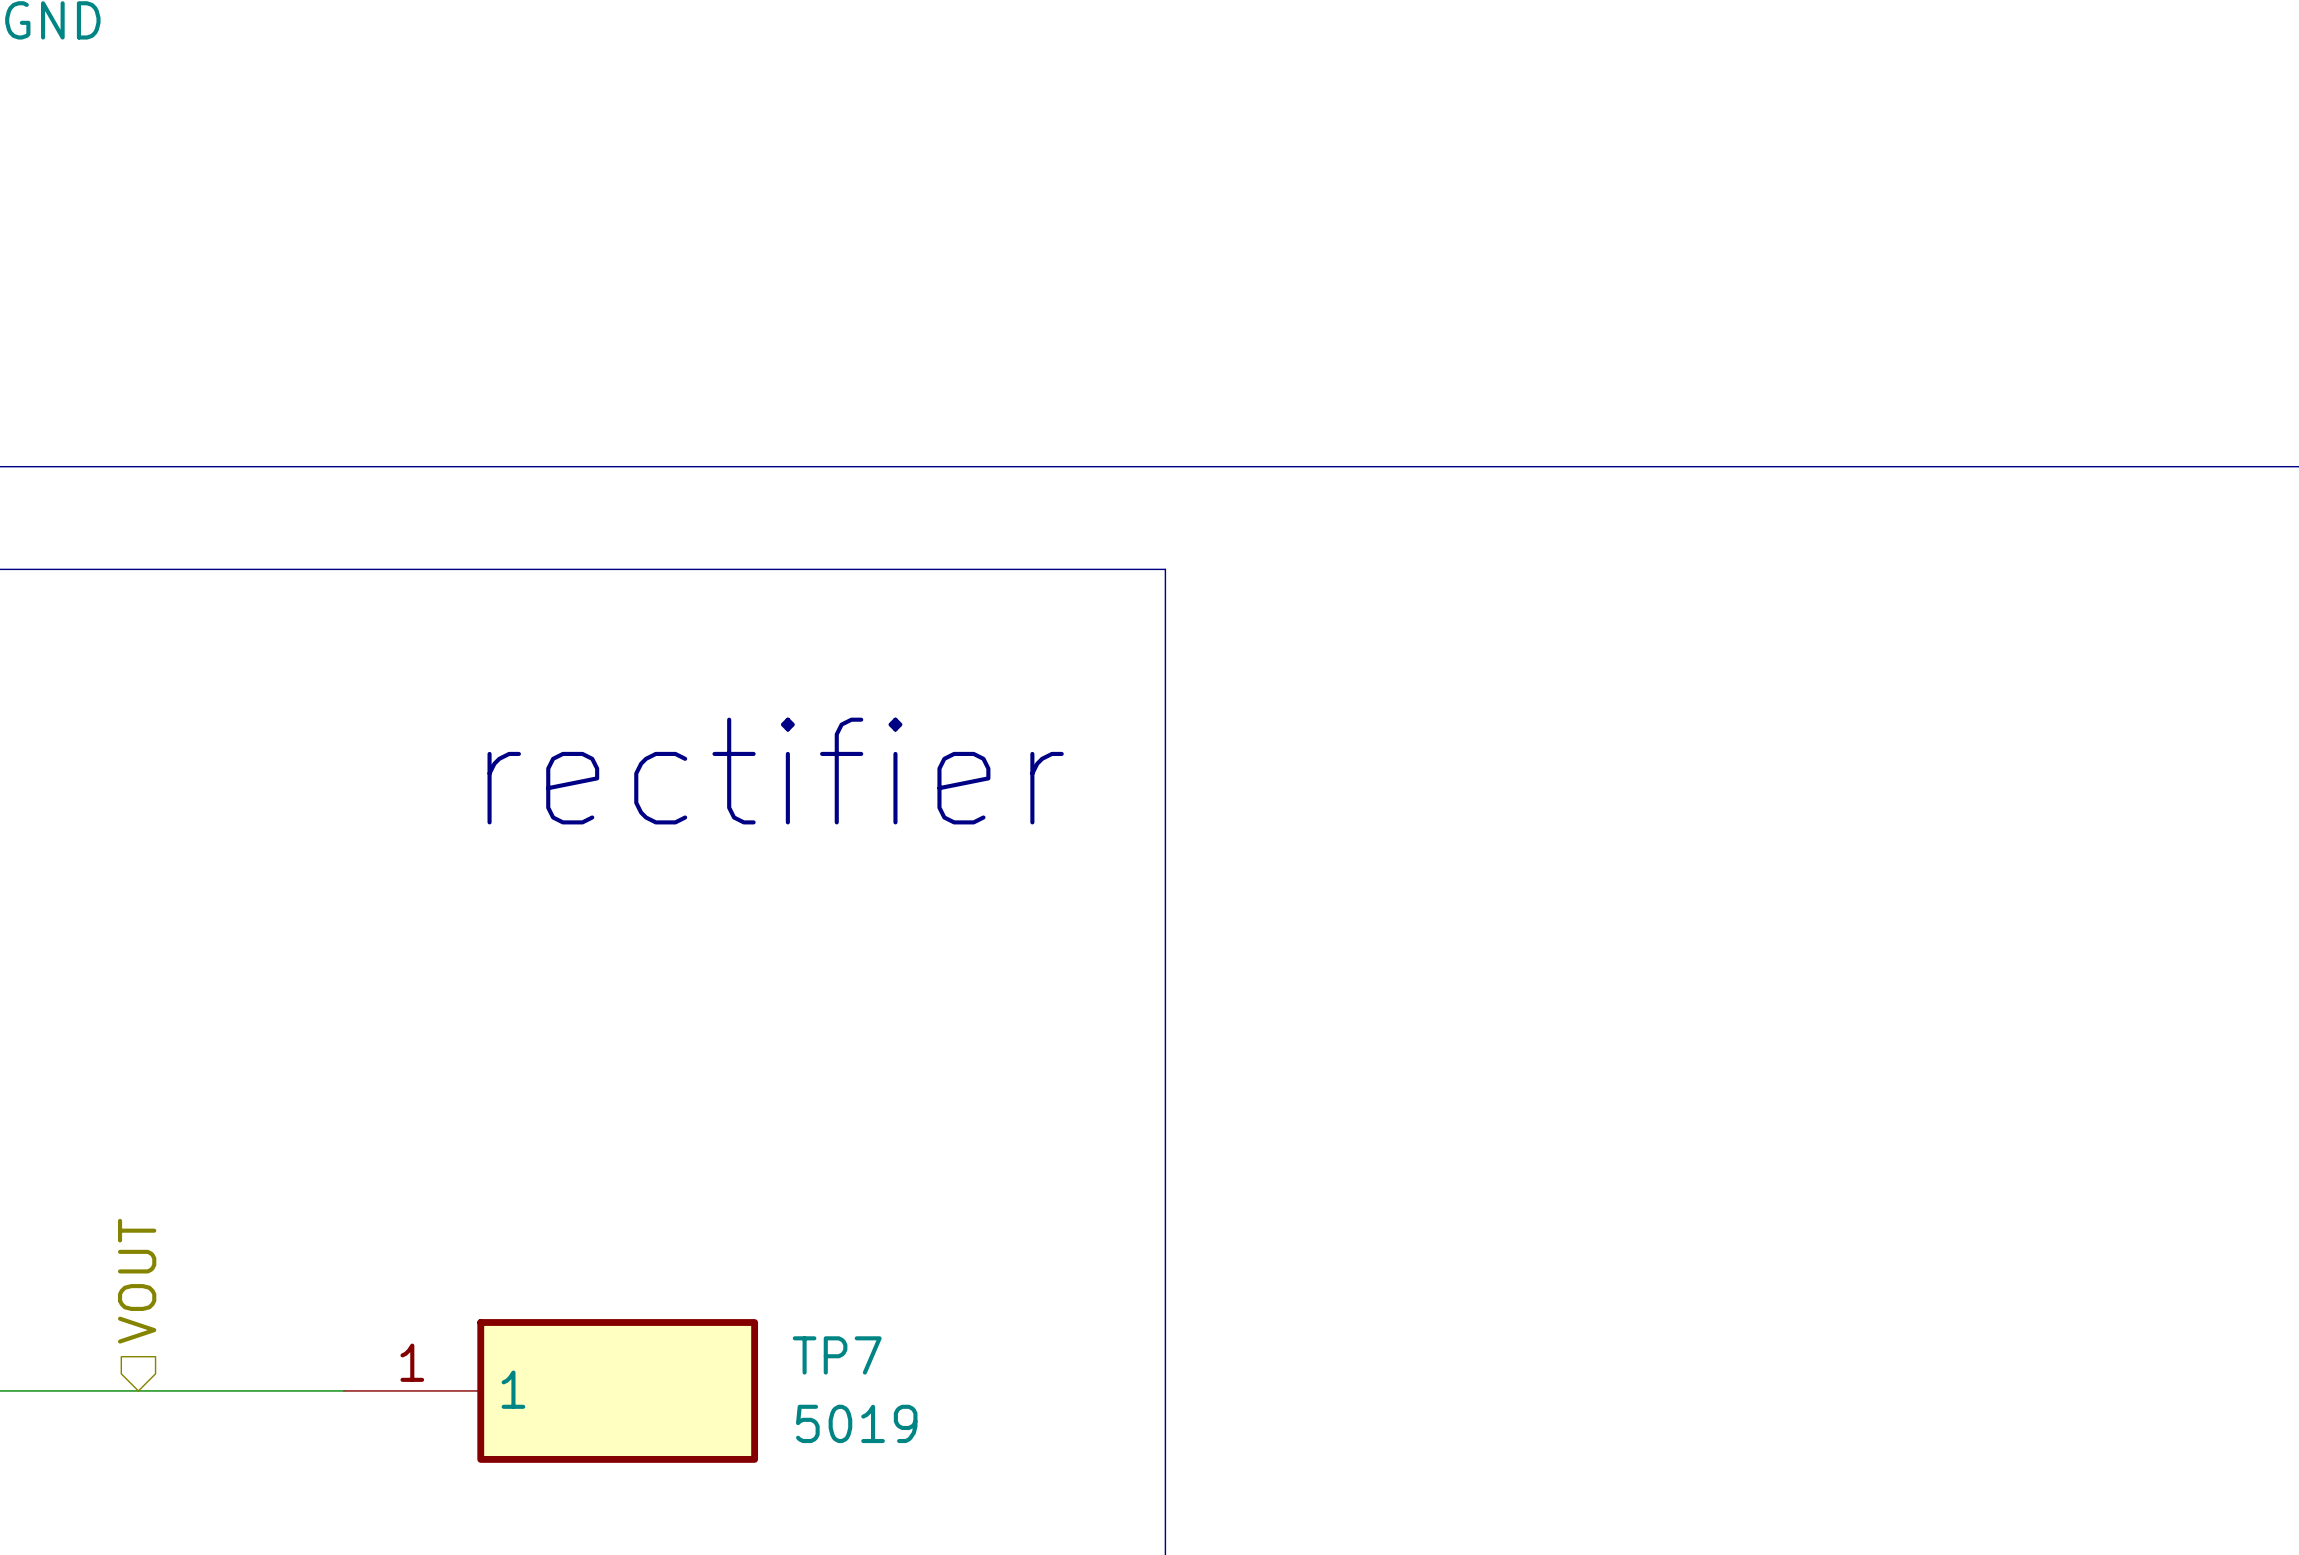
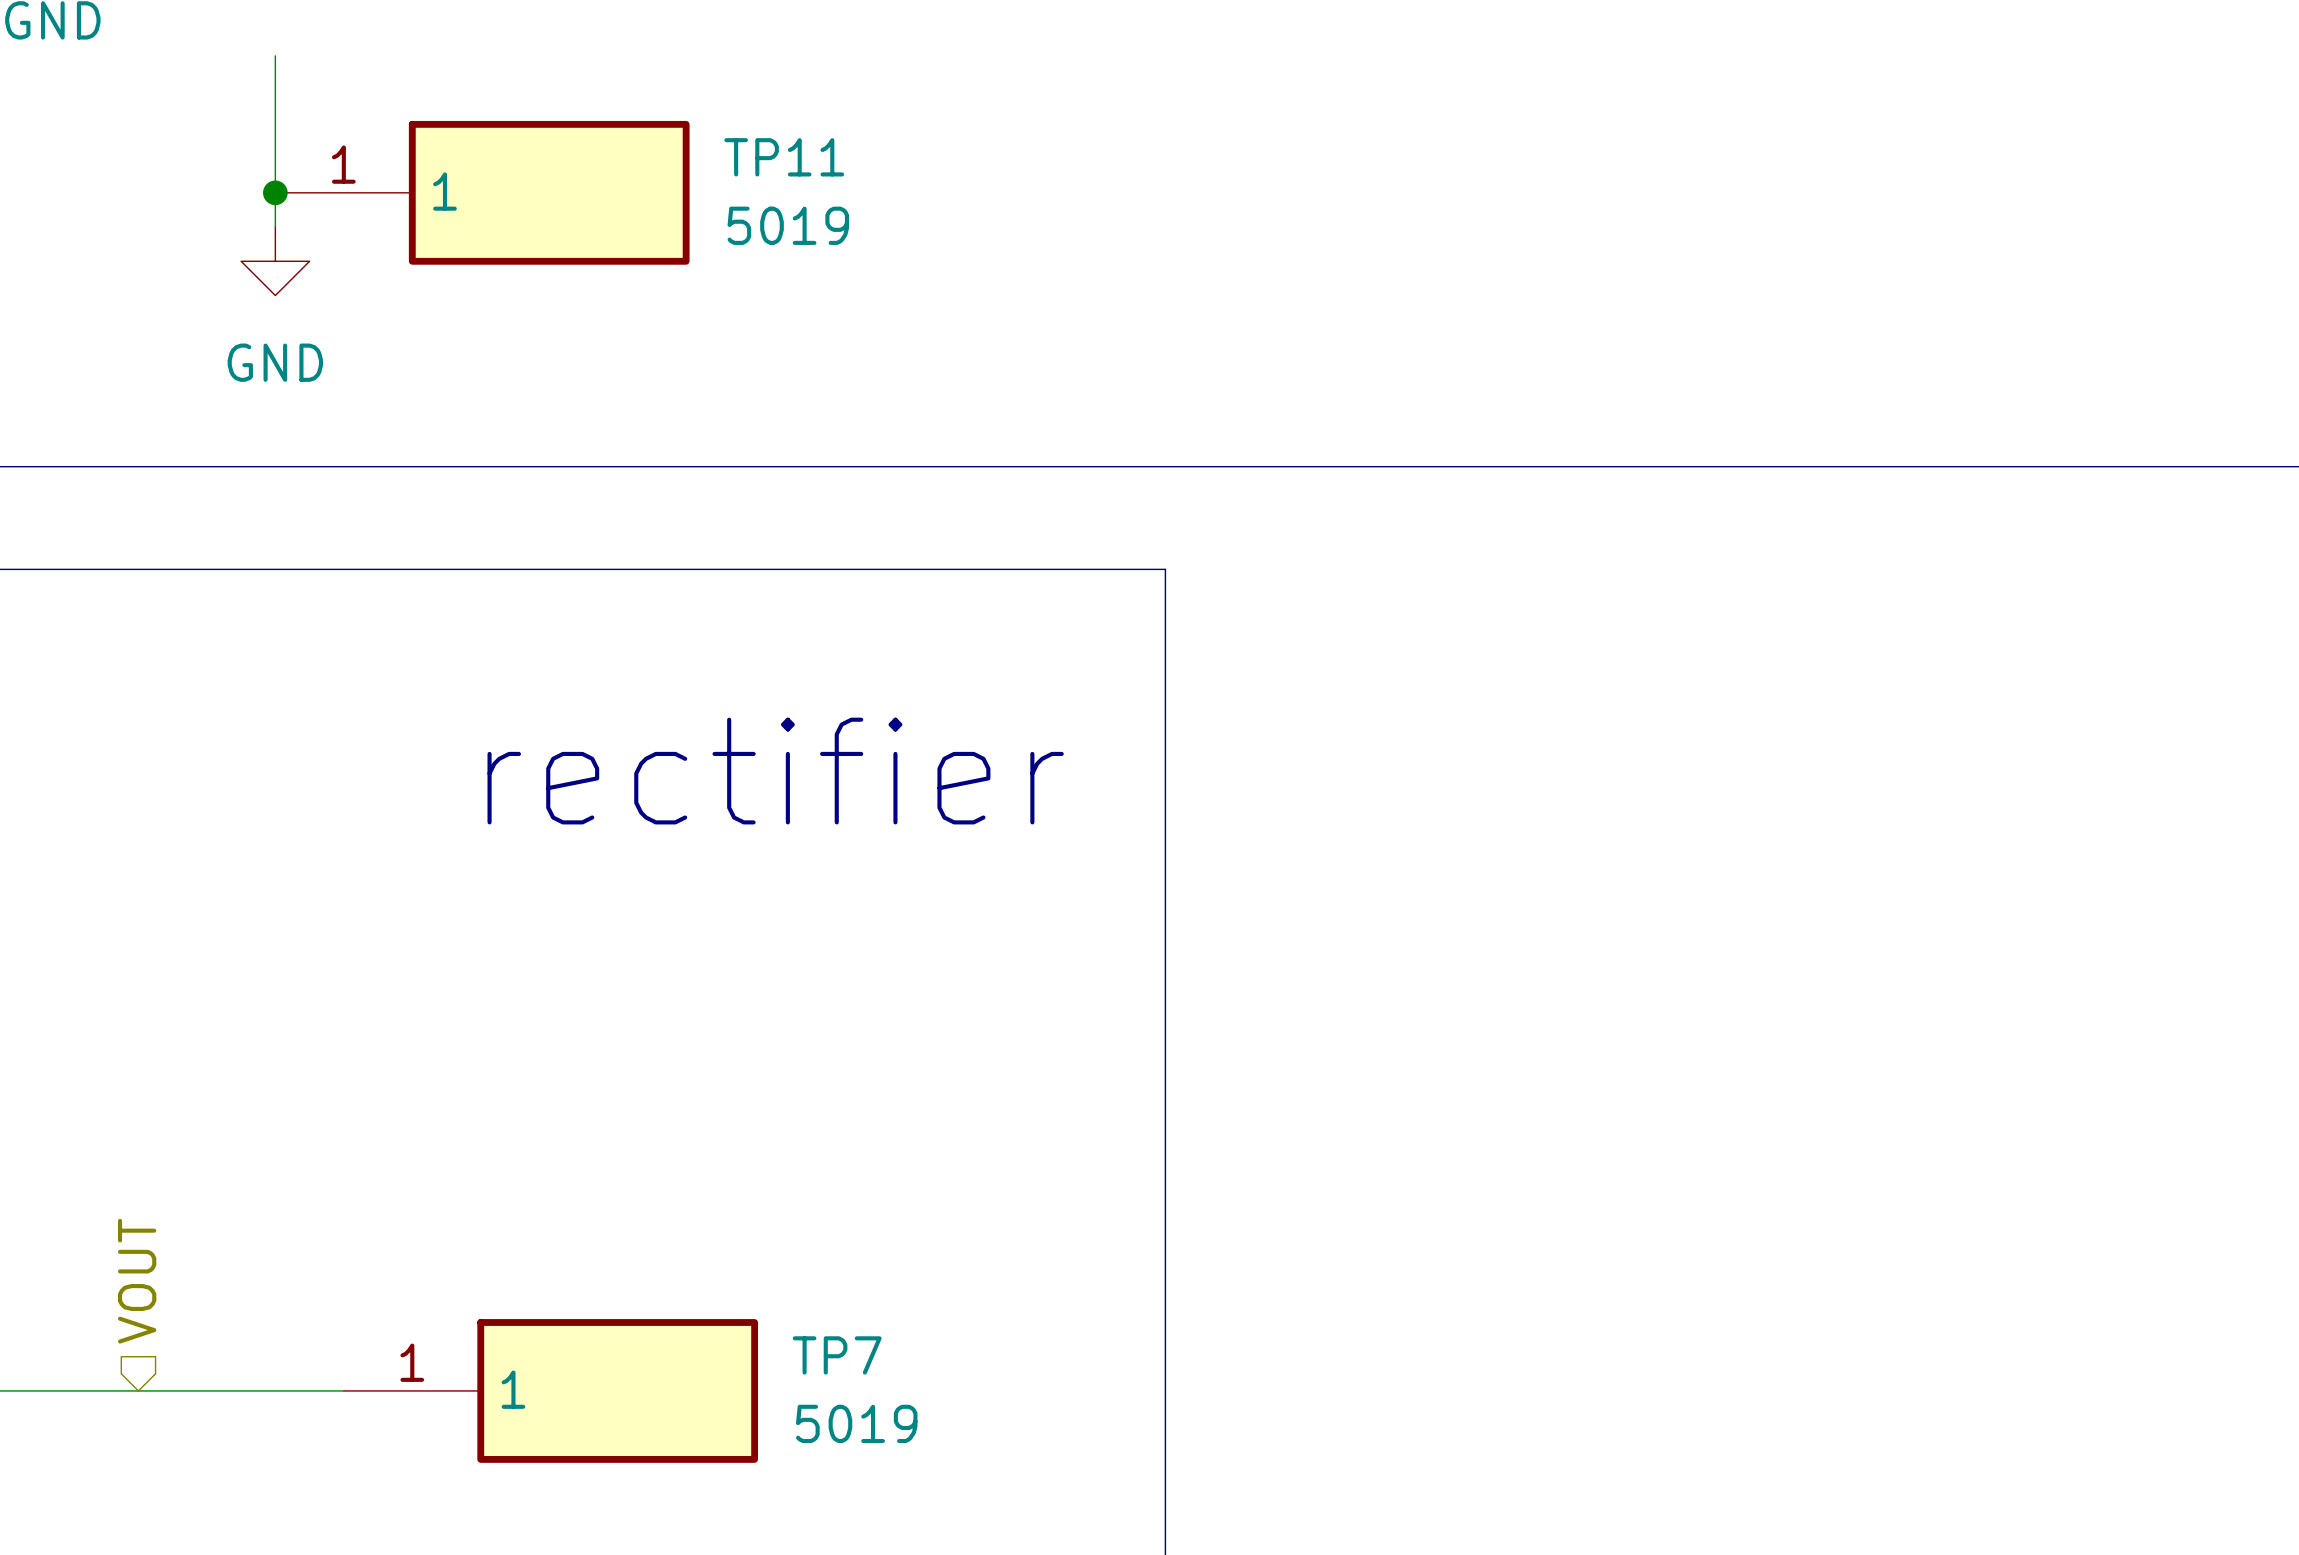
wire: none -> (275, 55) (275, 227)
junction: none -> (275, 192)
TP11: none -> 5019 (482, 192)
power symbol: none -> GND (275, 261)

